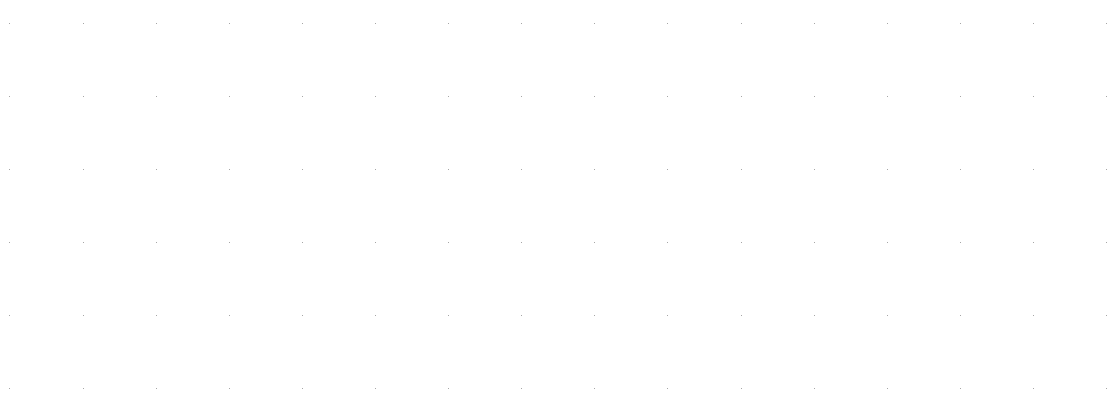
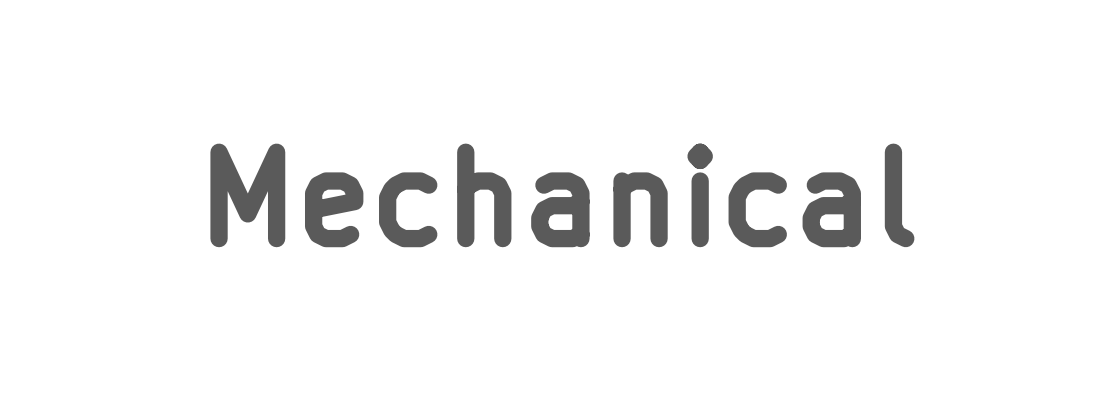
text: none -> Mechanical (562, 195)

